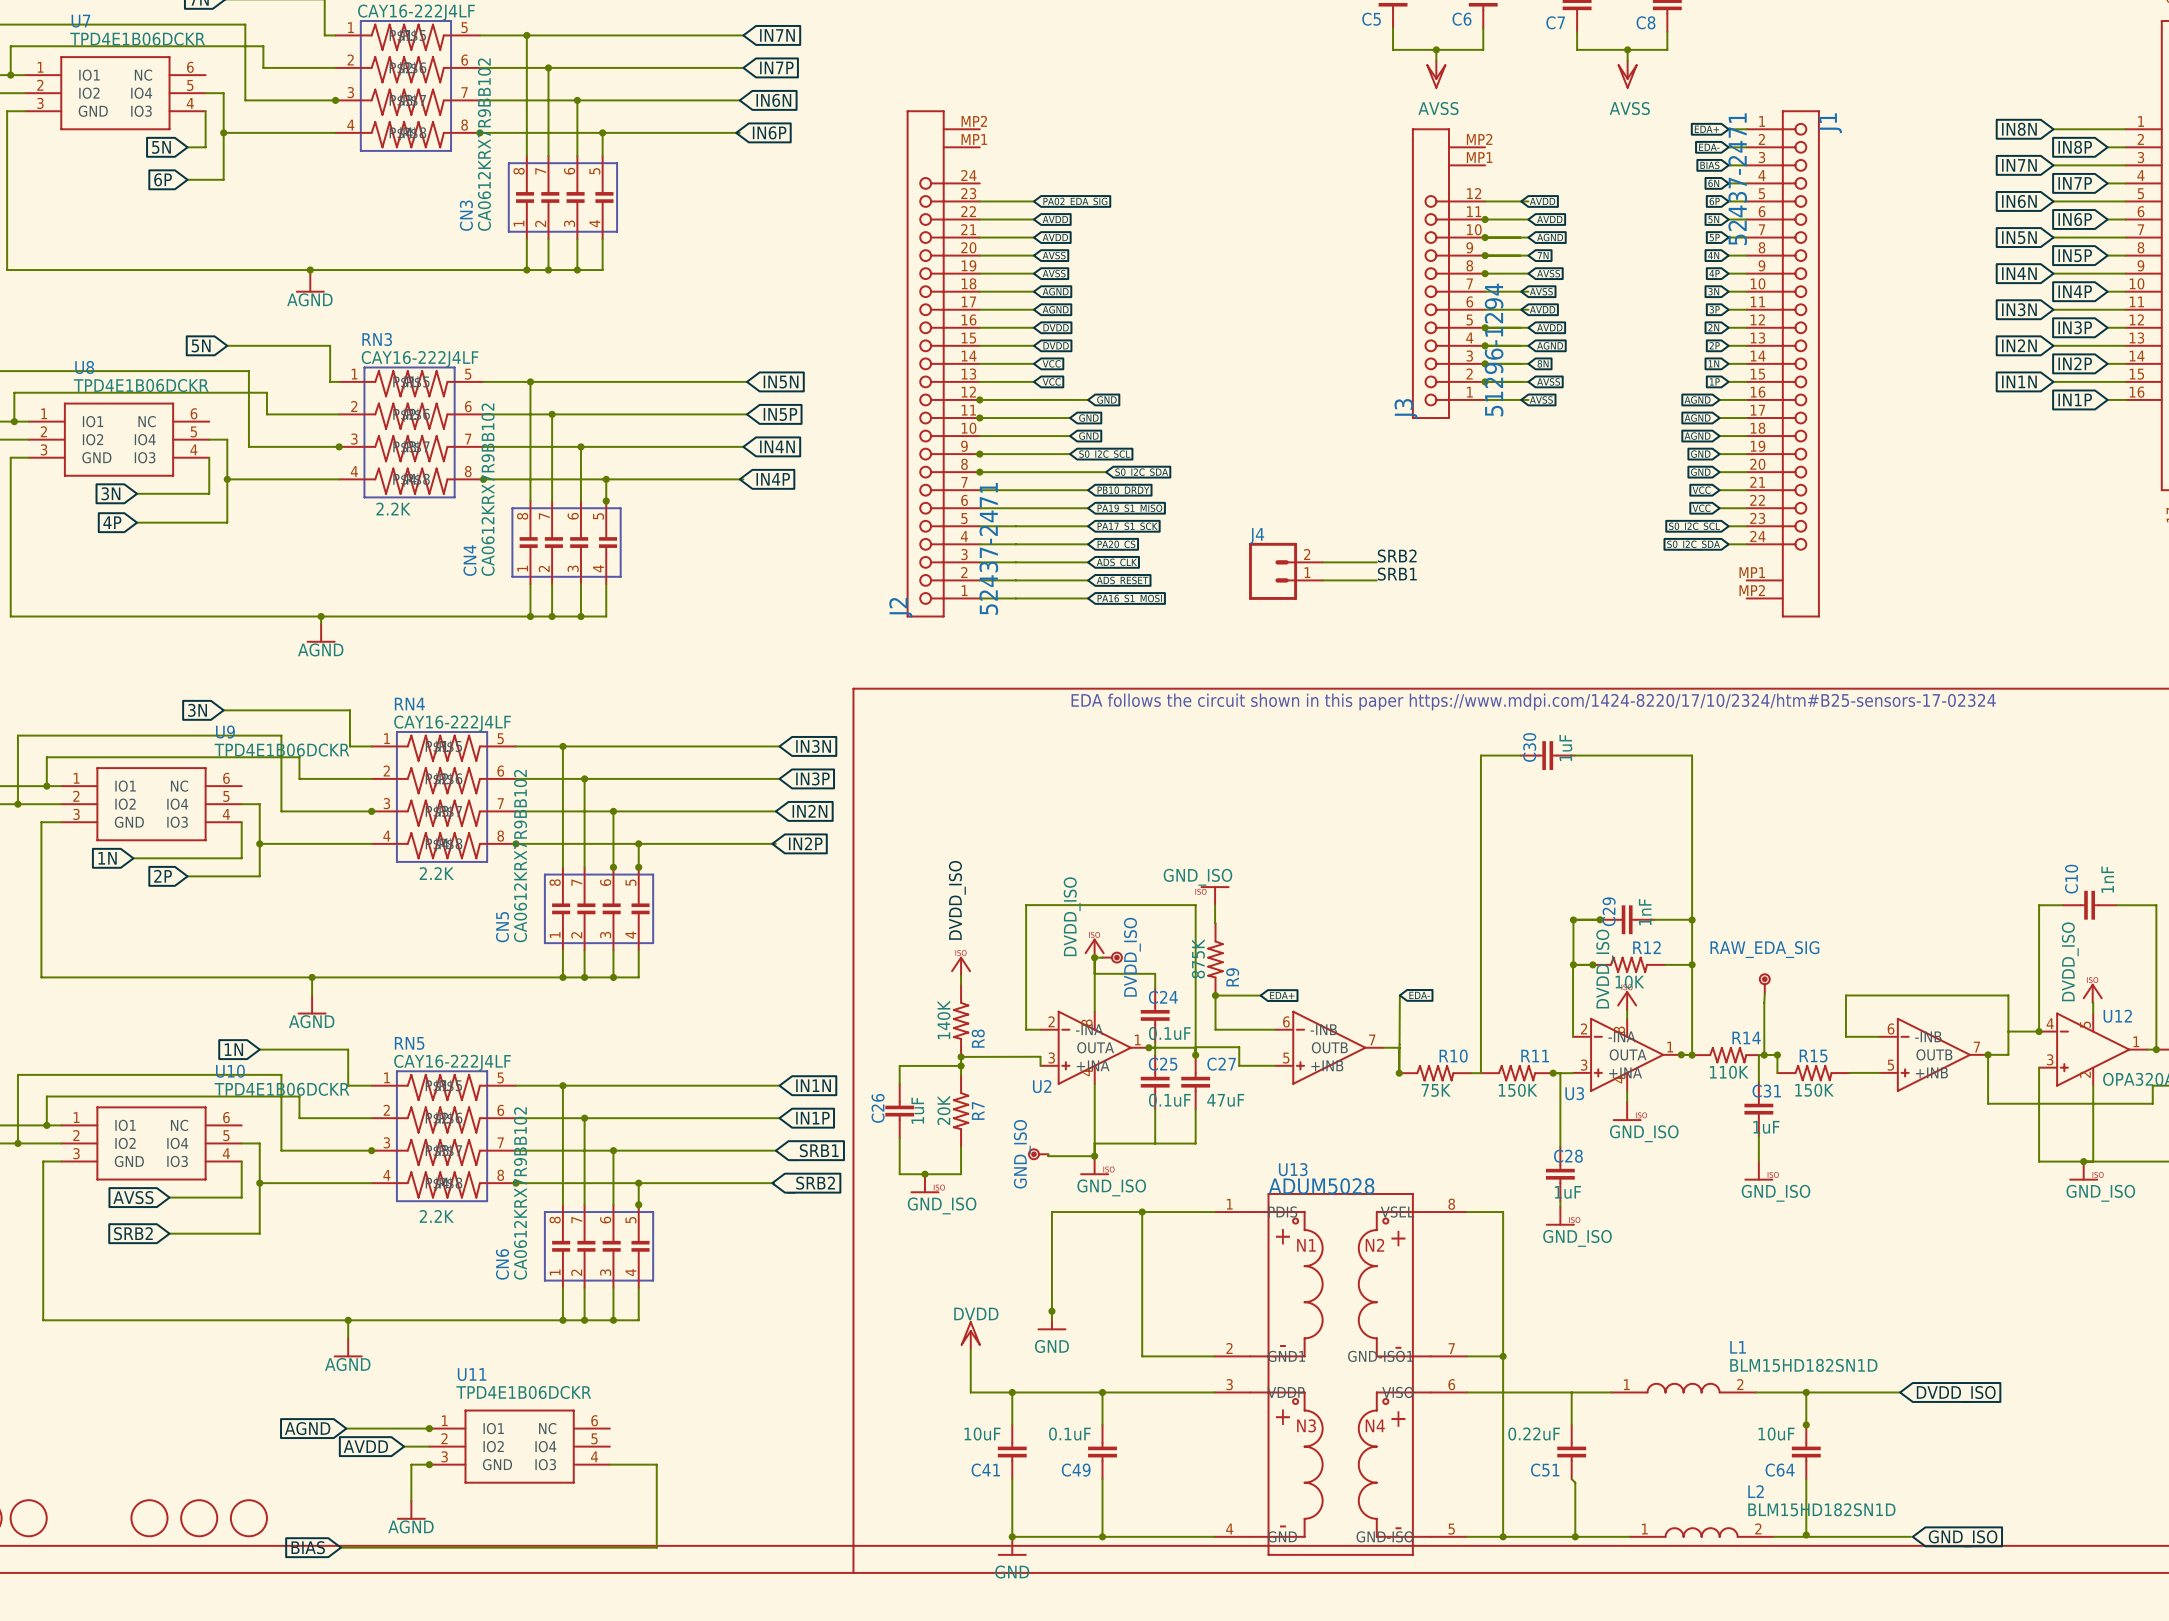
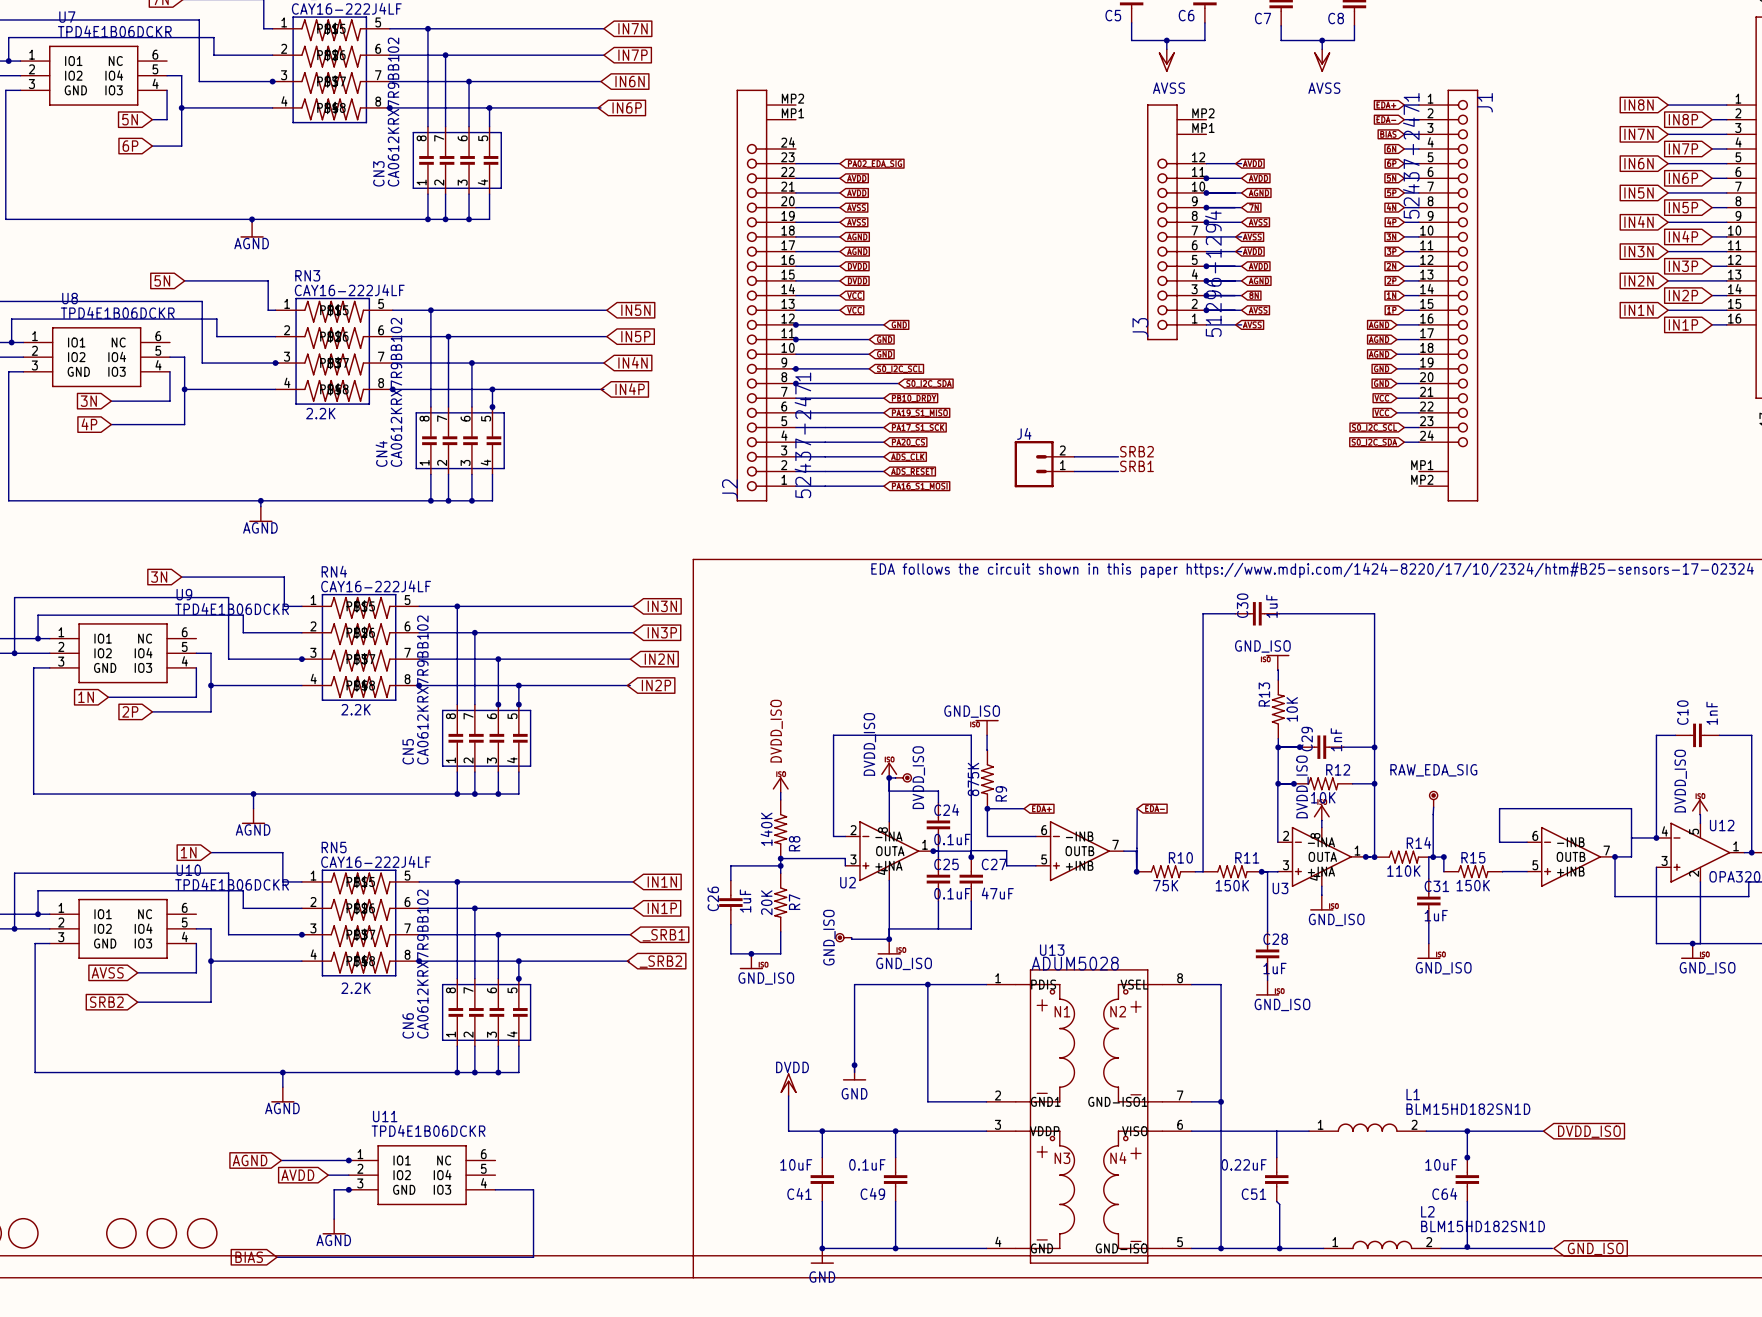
power symbol: none -> GND_ISO (1277, 662)
wire: none -> (1277, 670) (1278, 680)
R13: none -> 10K (1278, 709)
wire: none -> (1278, 738) (1278, 747)

